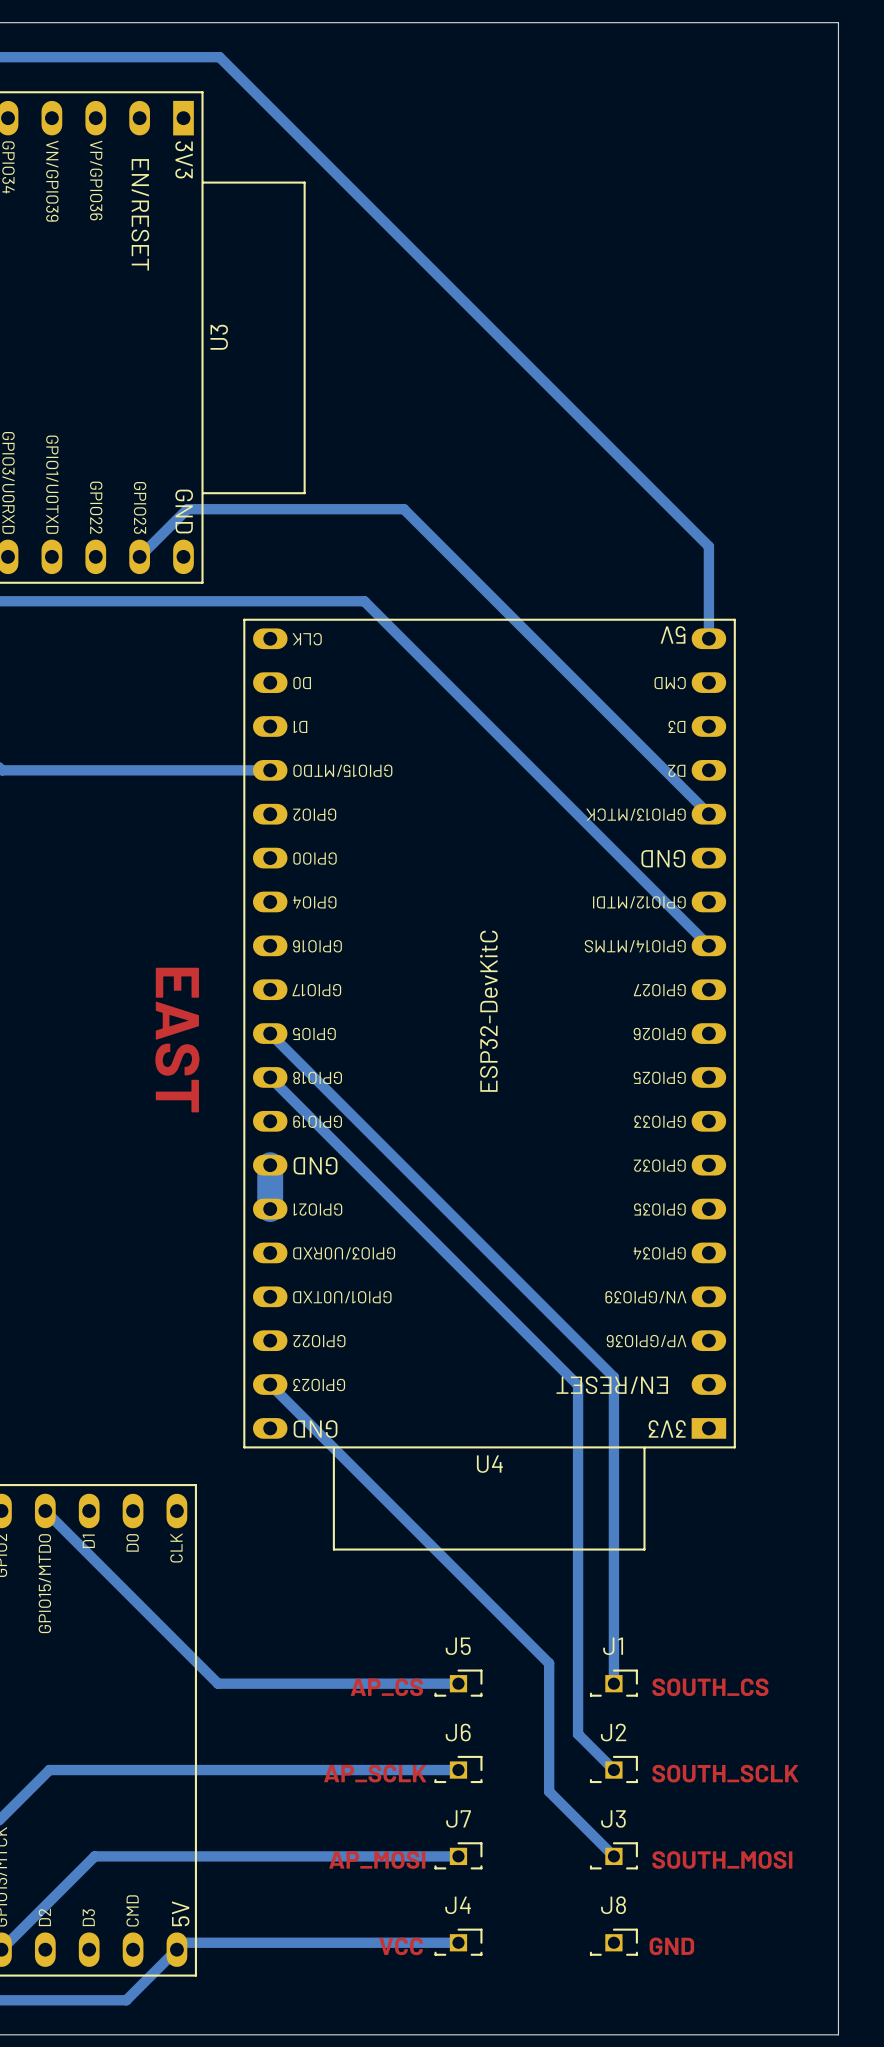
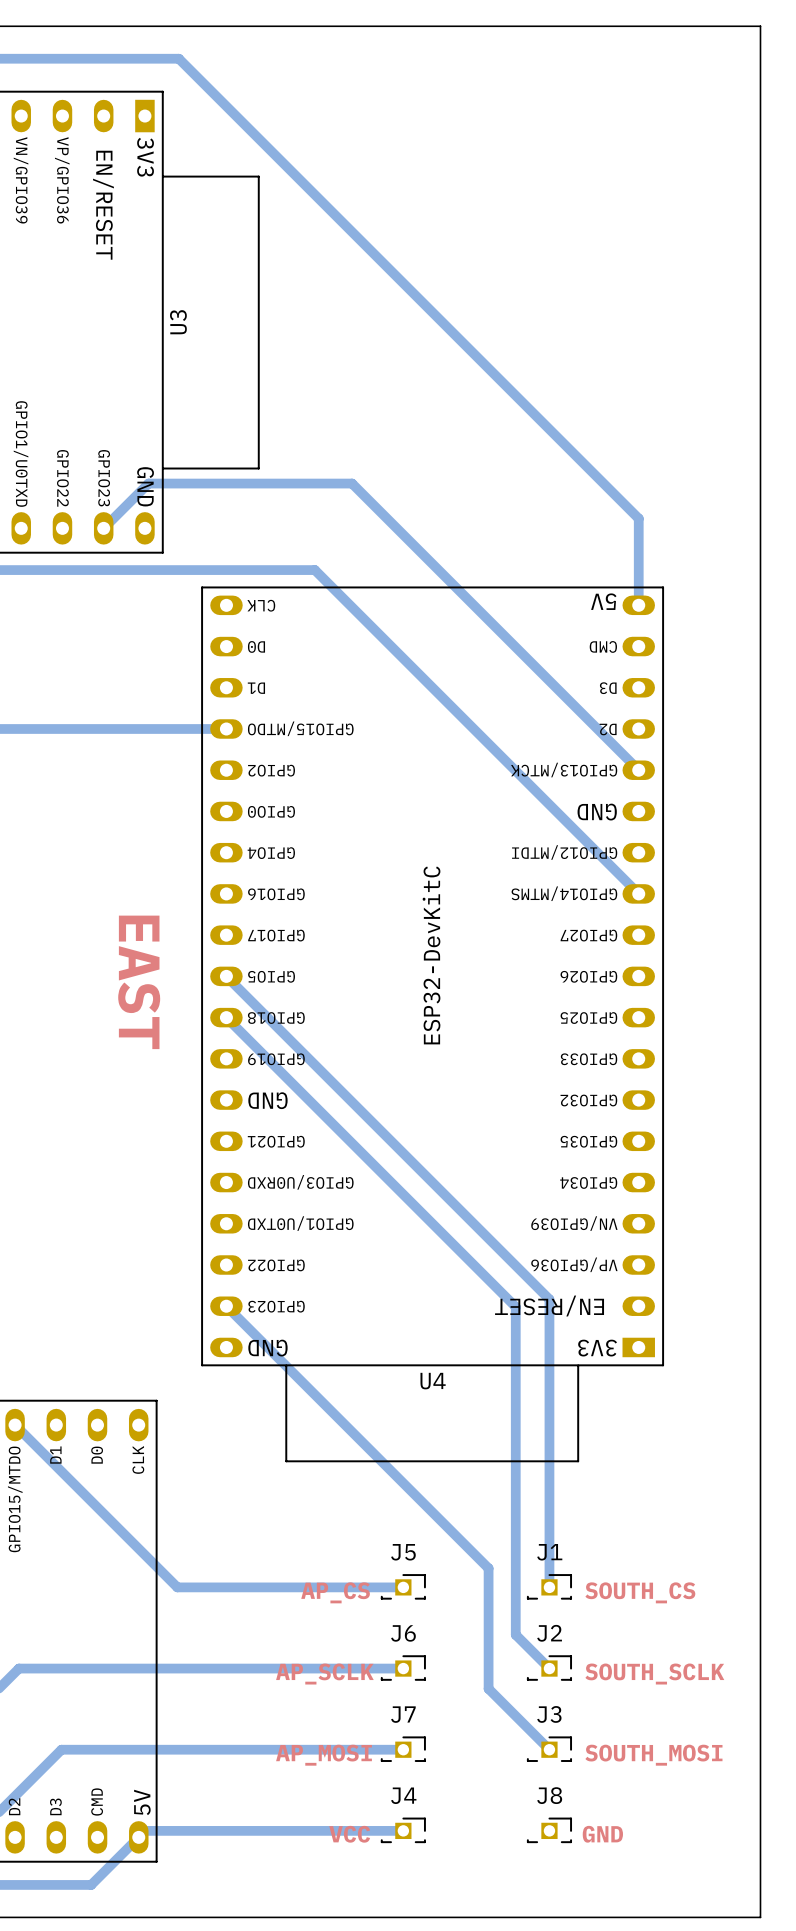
bottom track: (270, 1165) (270, 1209) -> none

